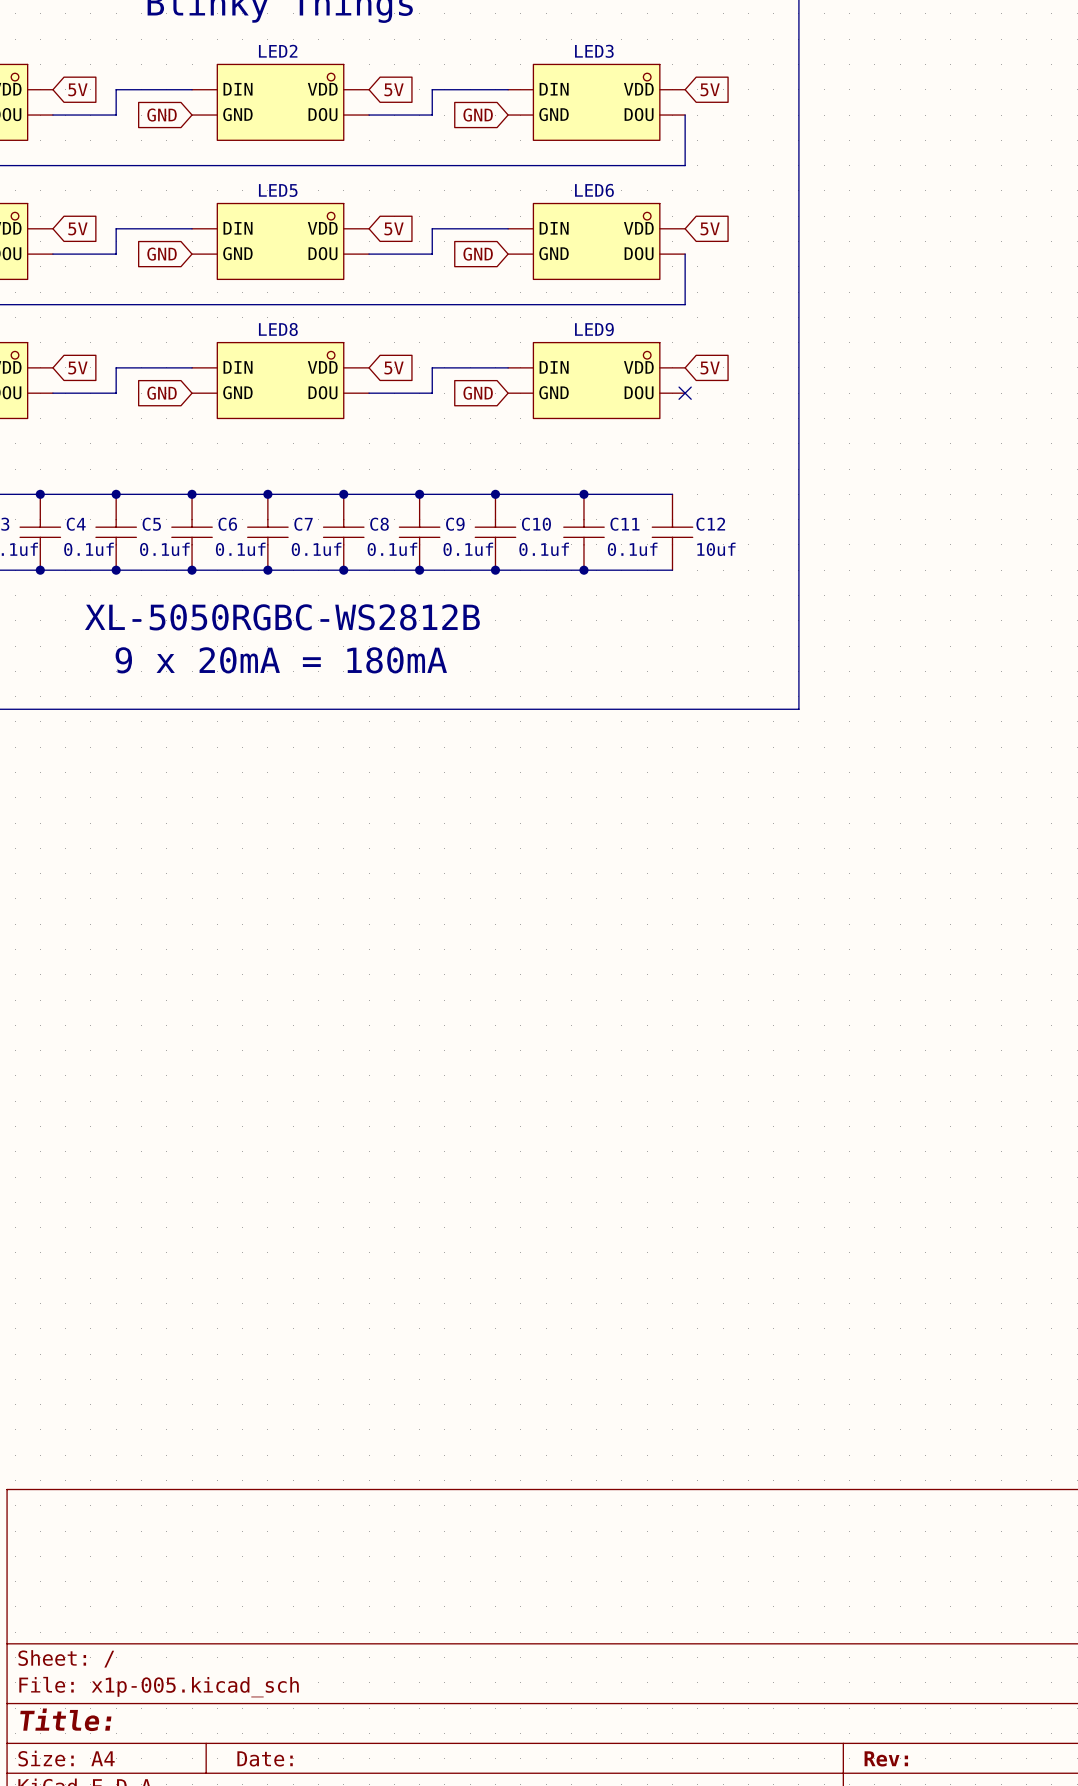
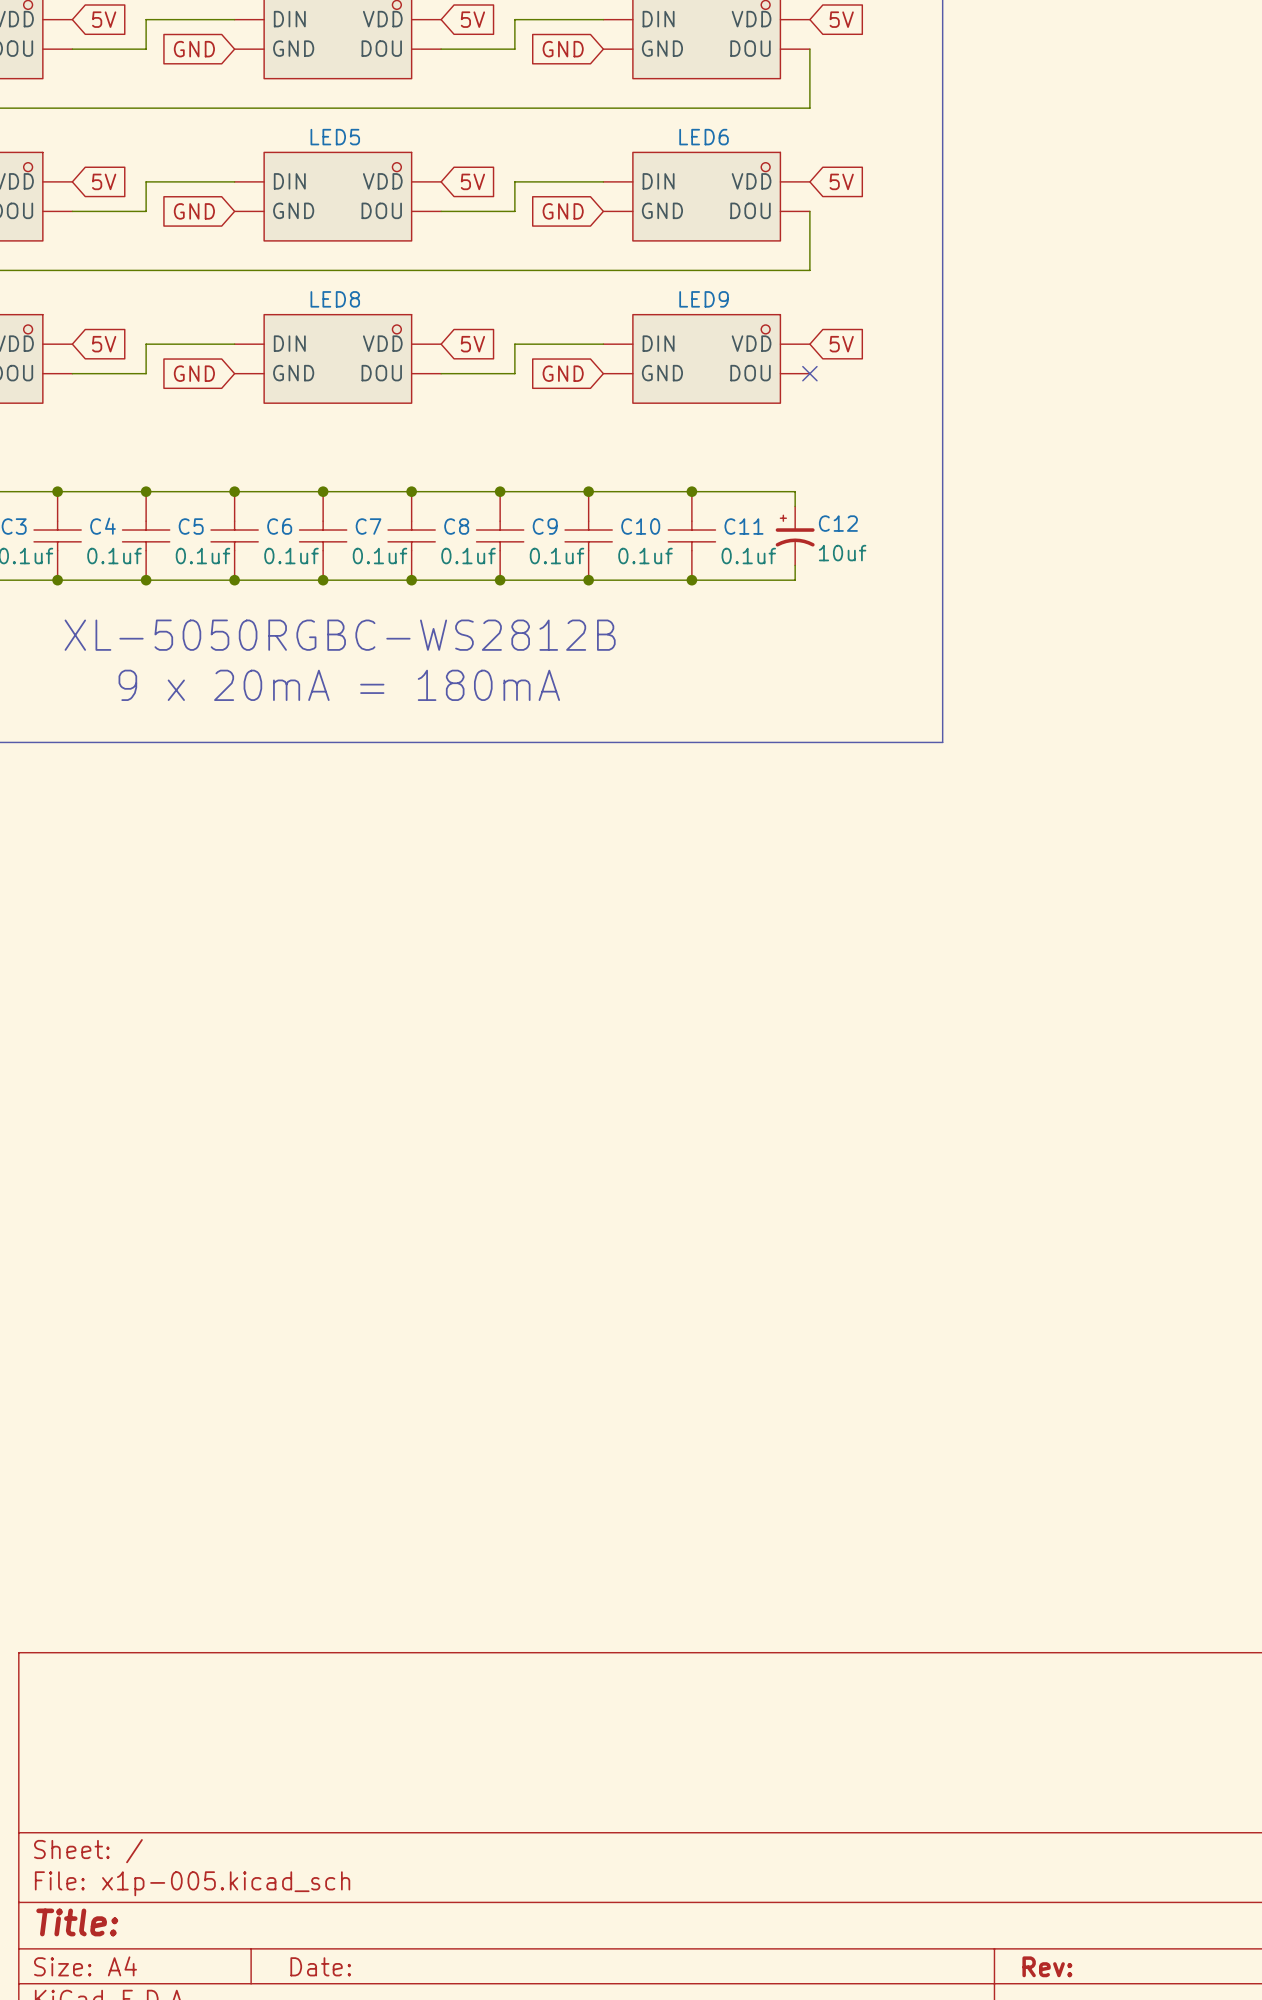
C12 symbol: [652, 494, 693, 571] -> [775, 506, 815, 566]

